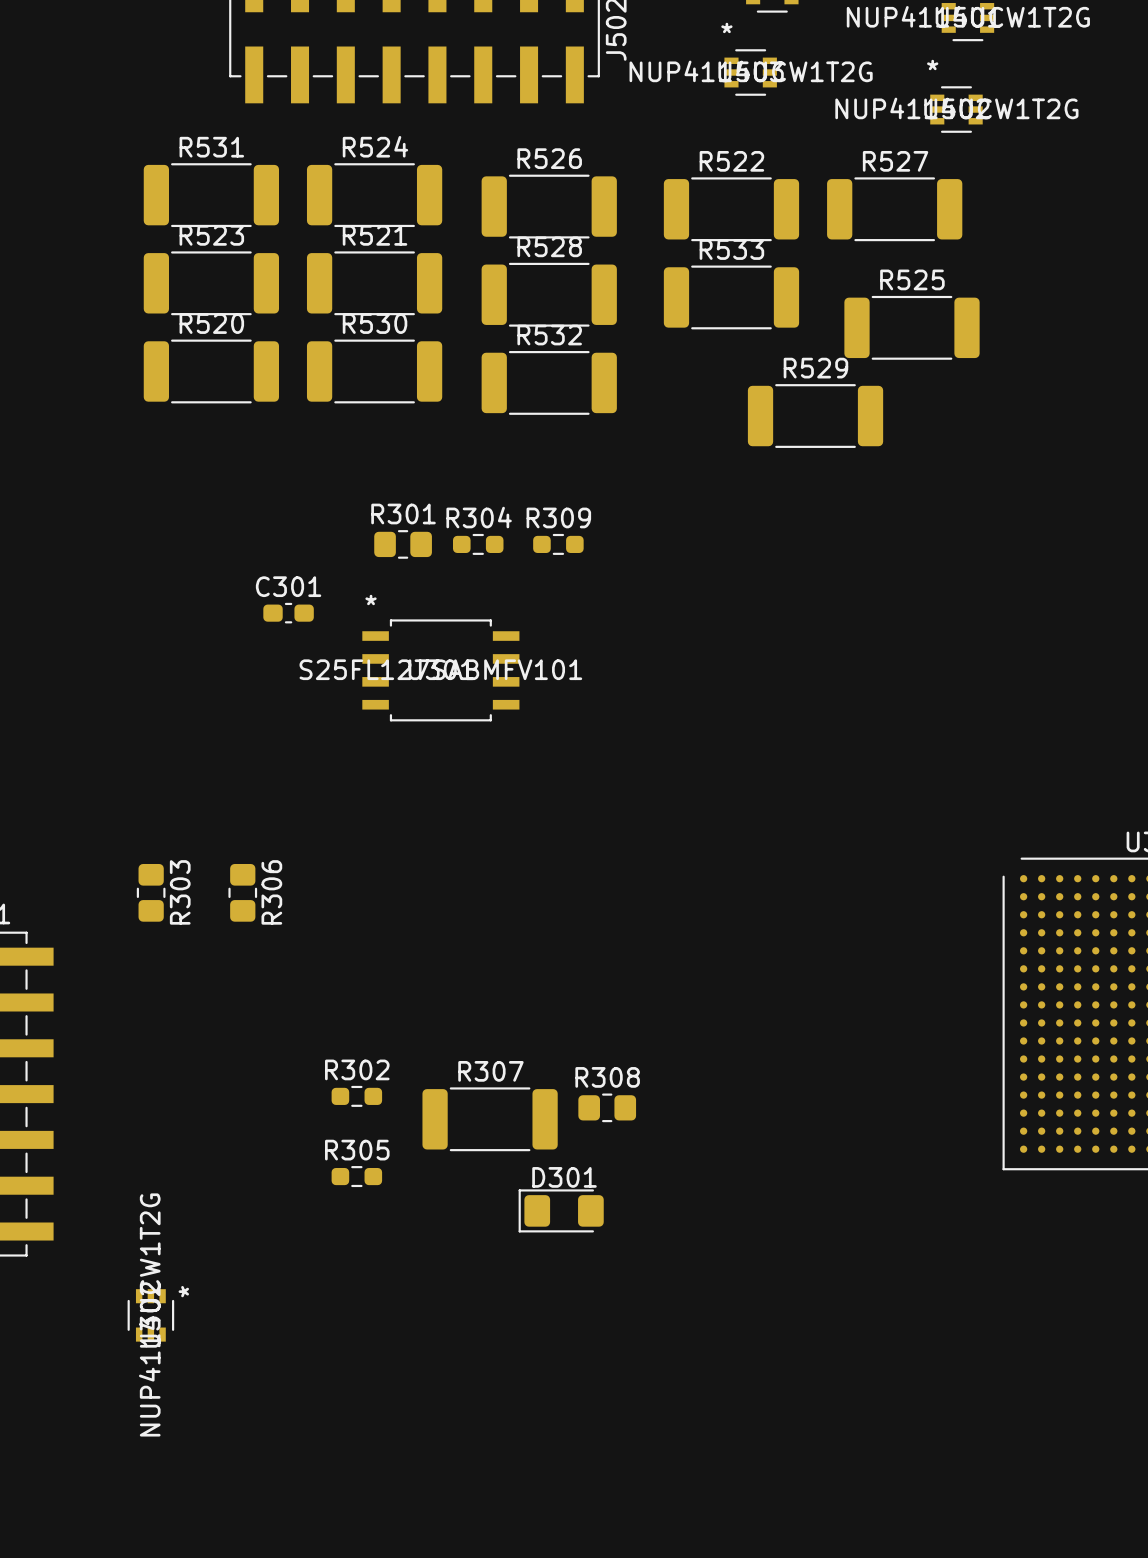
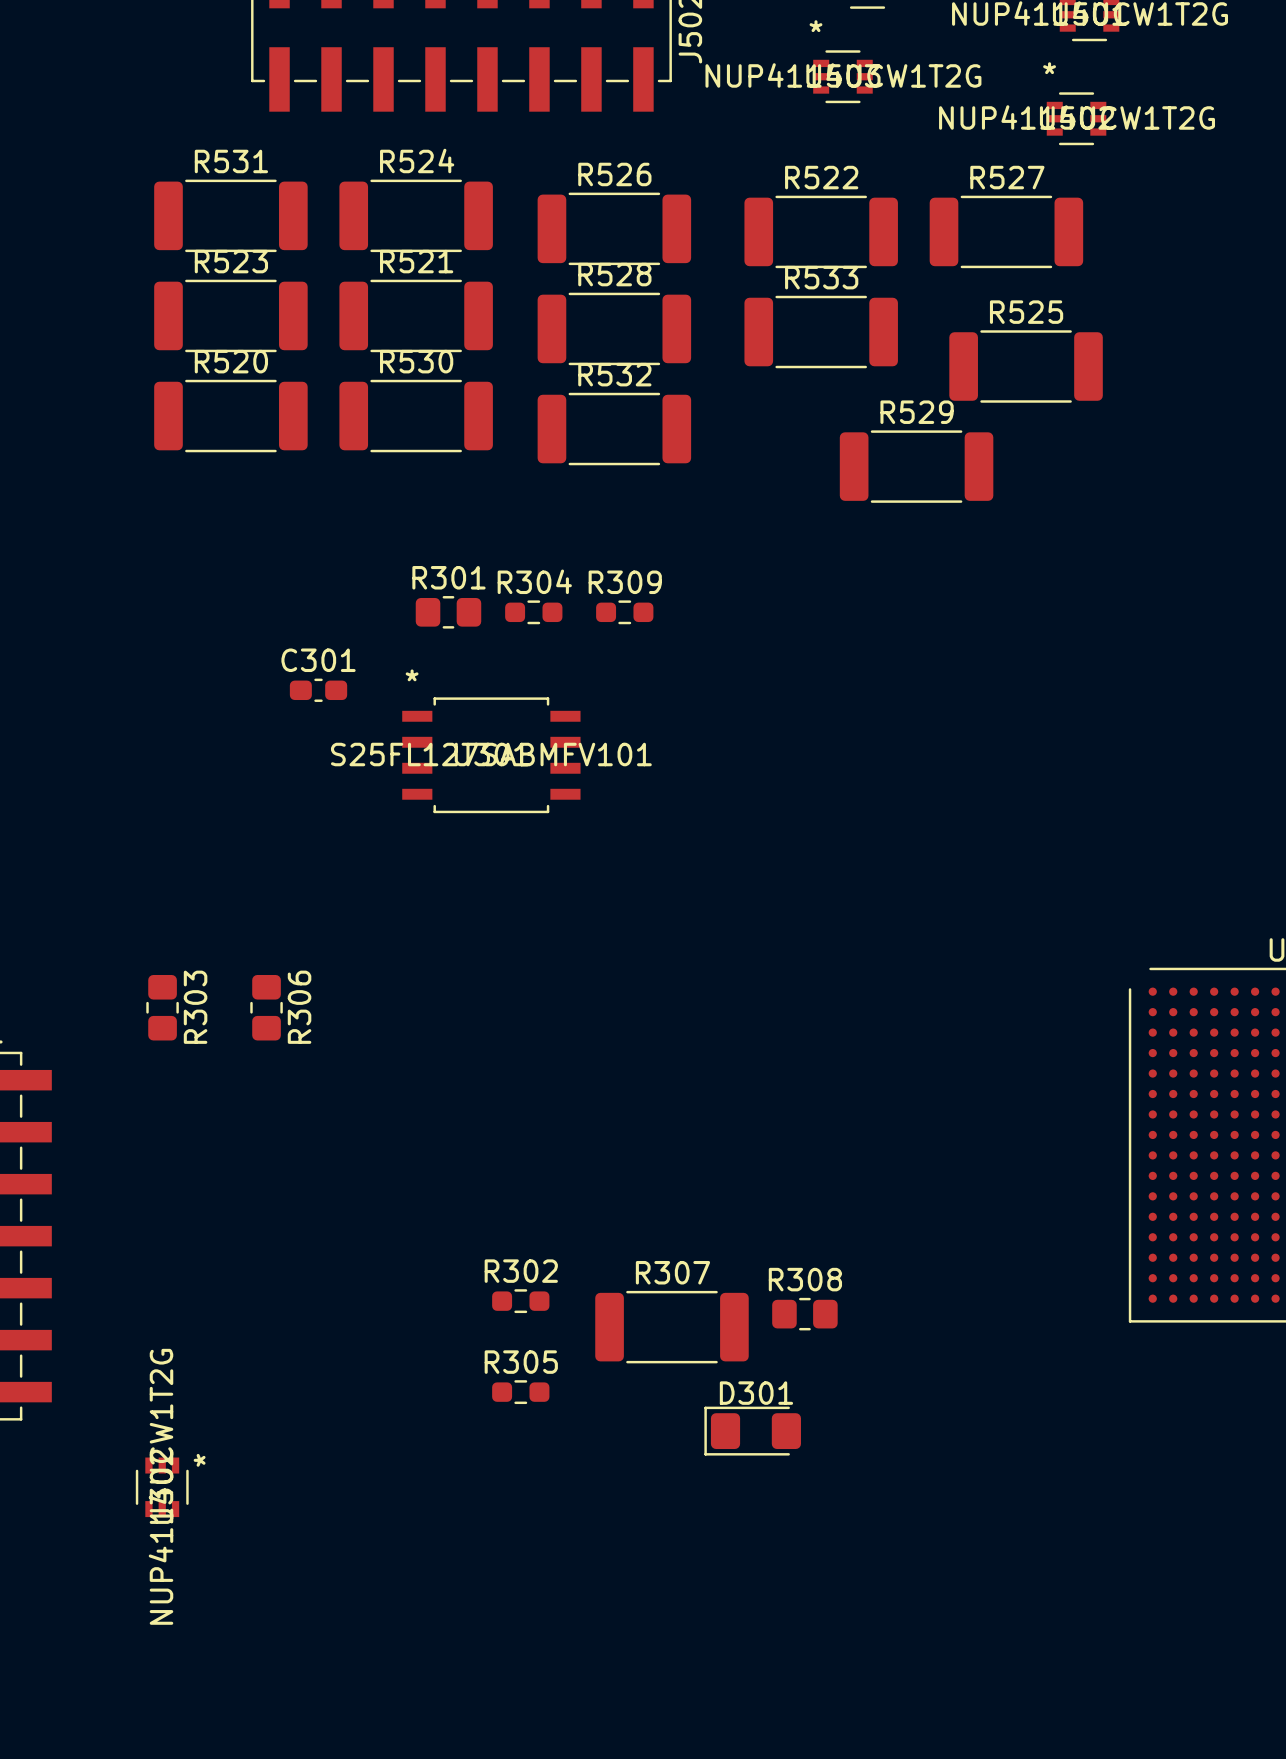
R302 position: (356, 1096) -> (520, 1301)
R308 position: (607, 1107) -> (804, 1314)
R307 position: (490, 1119) -> (671, 1327)
R305 position: (356, 1176) -> (520, 1392)
D301 position: (561, 1210) -> (752, 1431)

